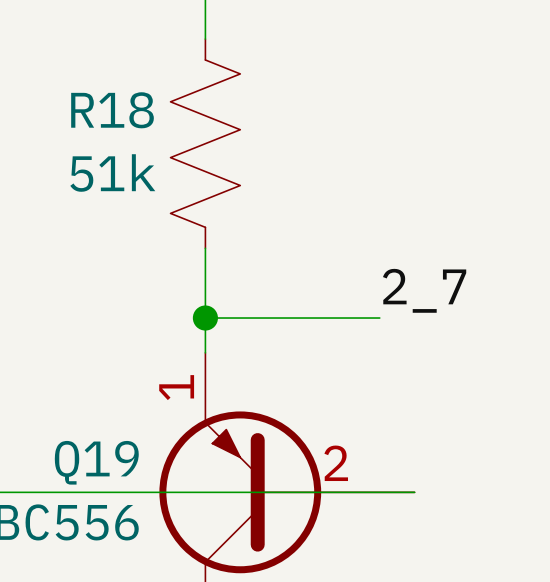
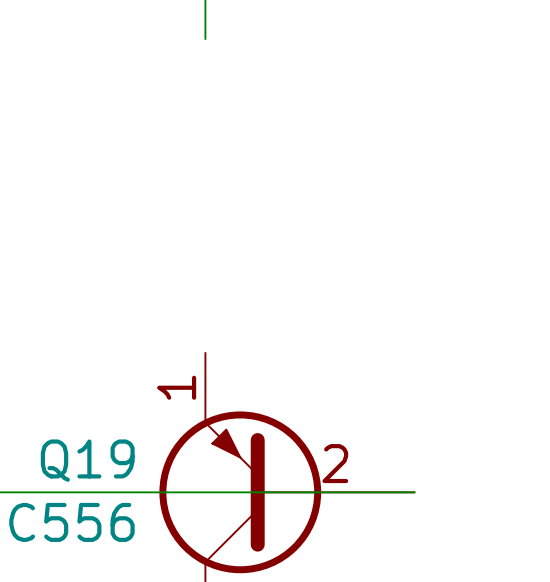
R18: 51k (205, 143) -> none
wire: (205, 248) (205, 352) -> none
label: 2_7 (424, 290) -> none
wire: (205, 318) (379, 318) -> none
junction: (205, 318) -> none

